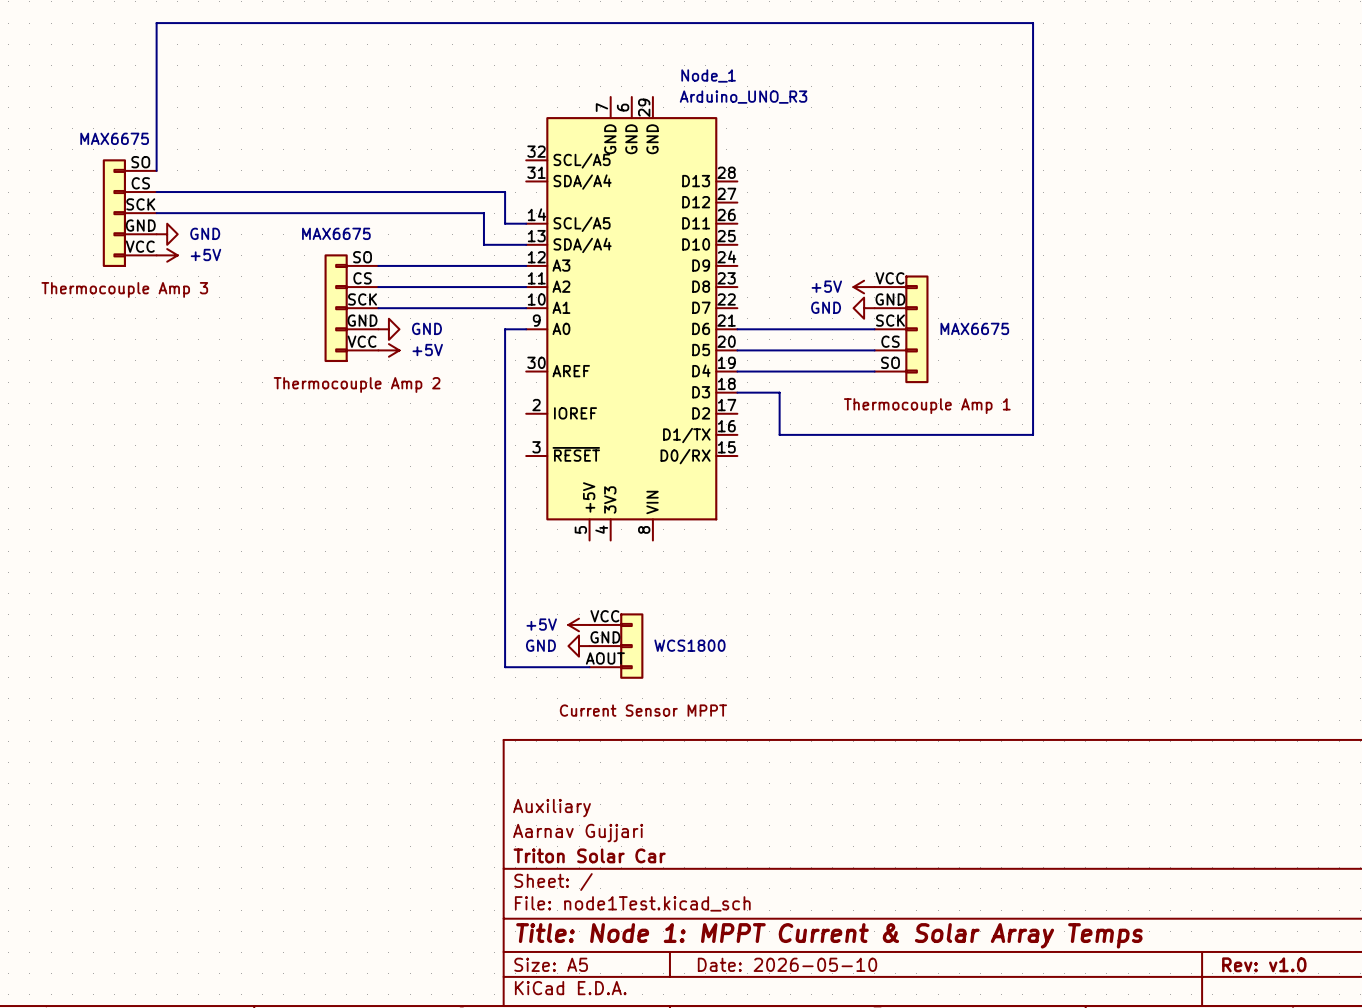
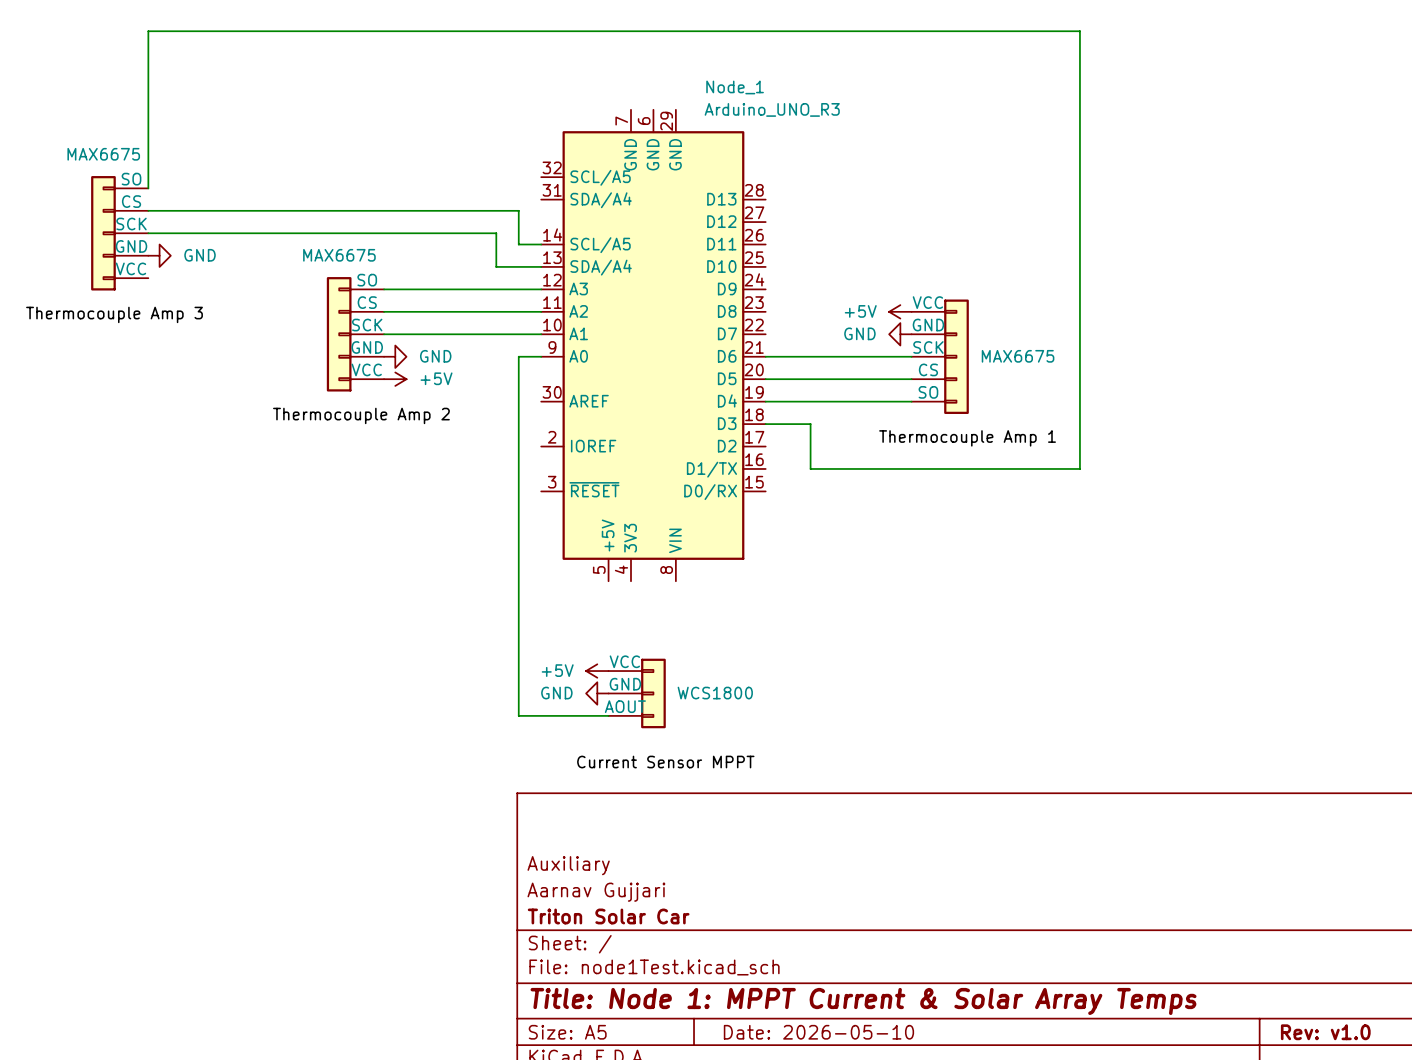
power symbol: +5V (167, 255) -> none

